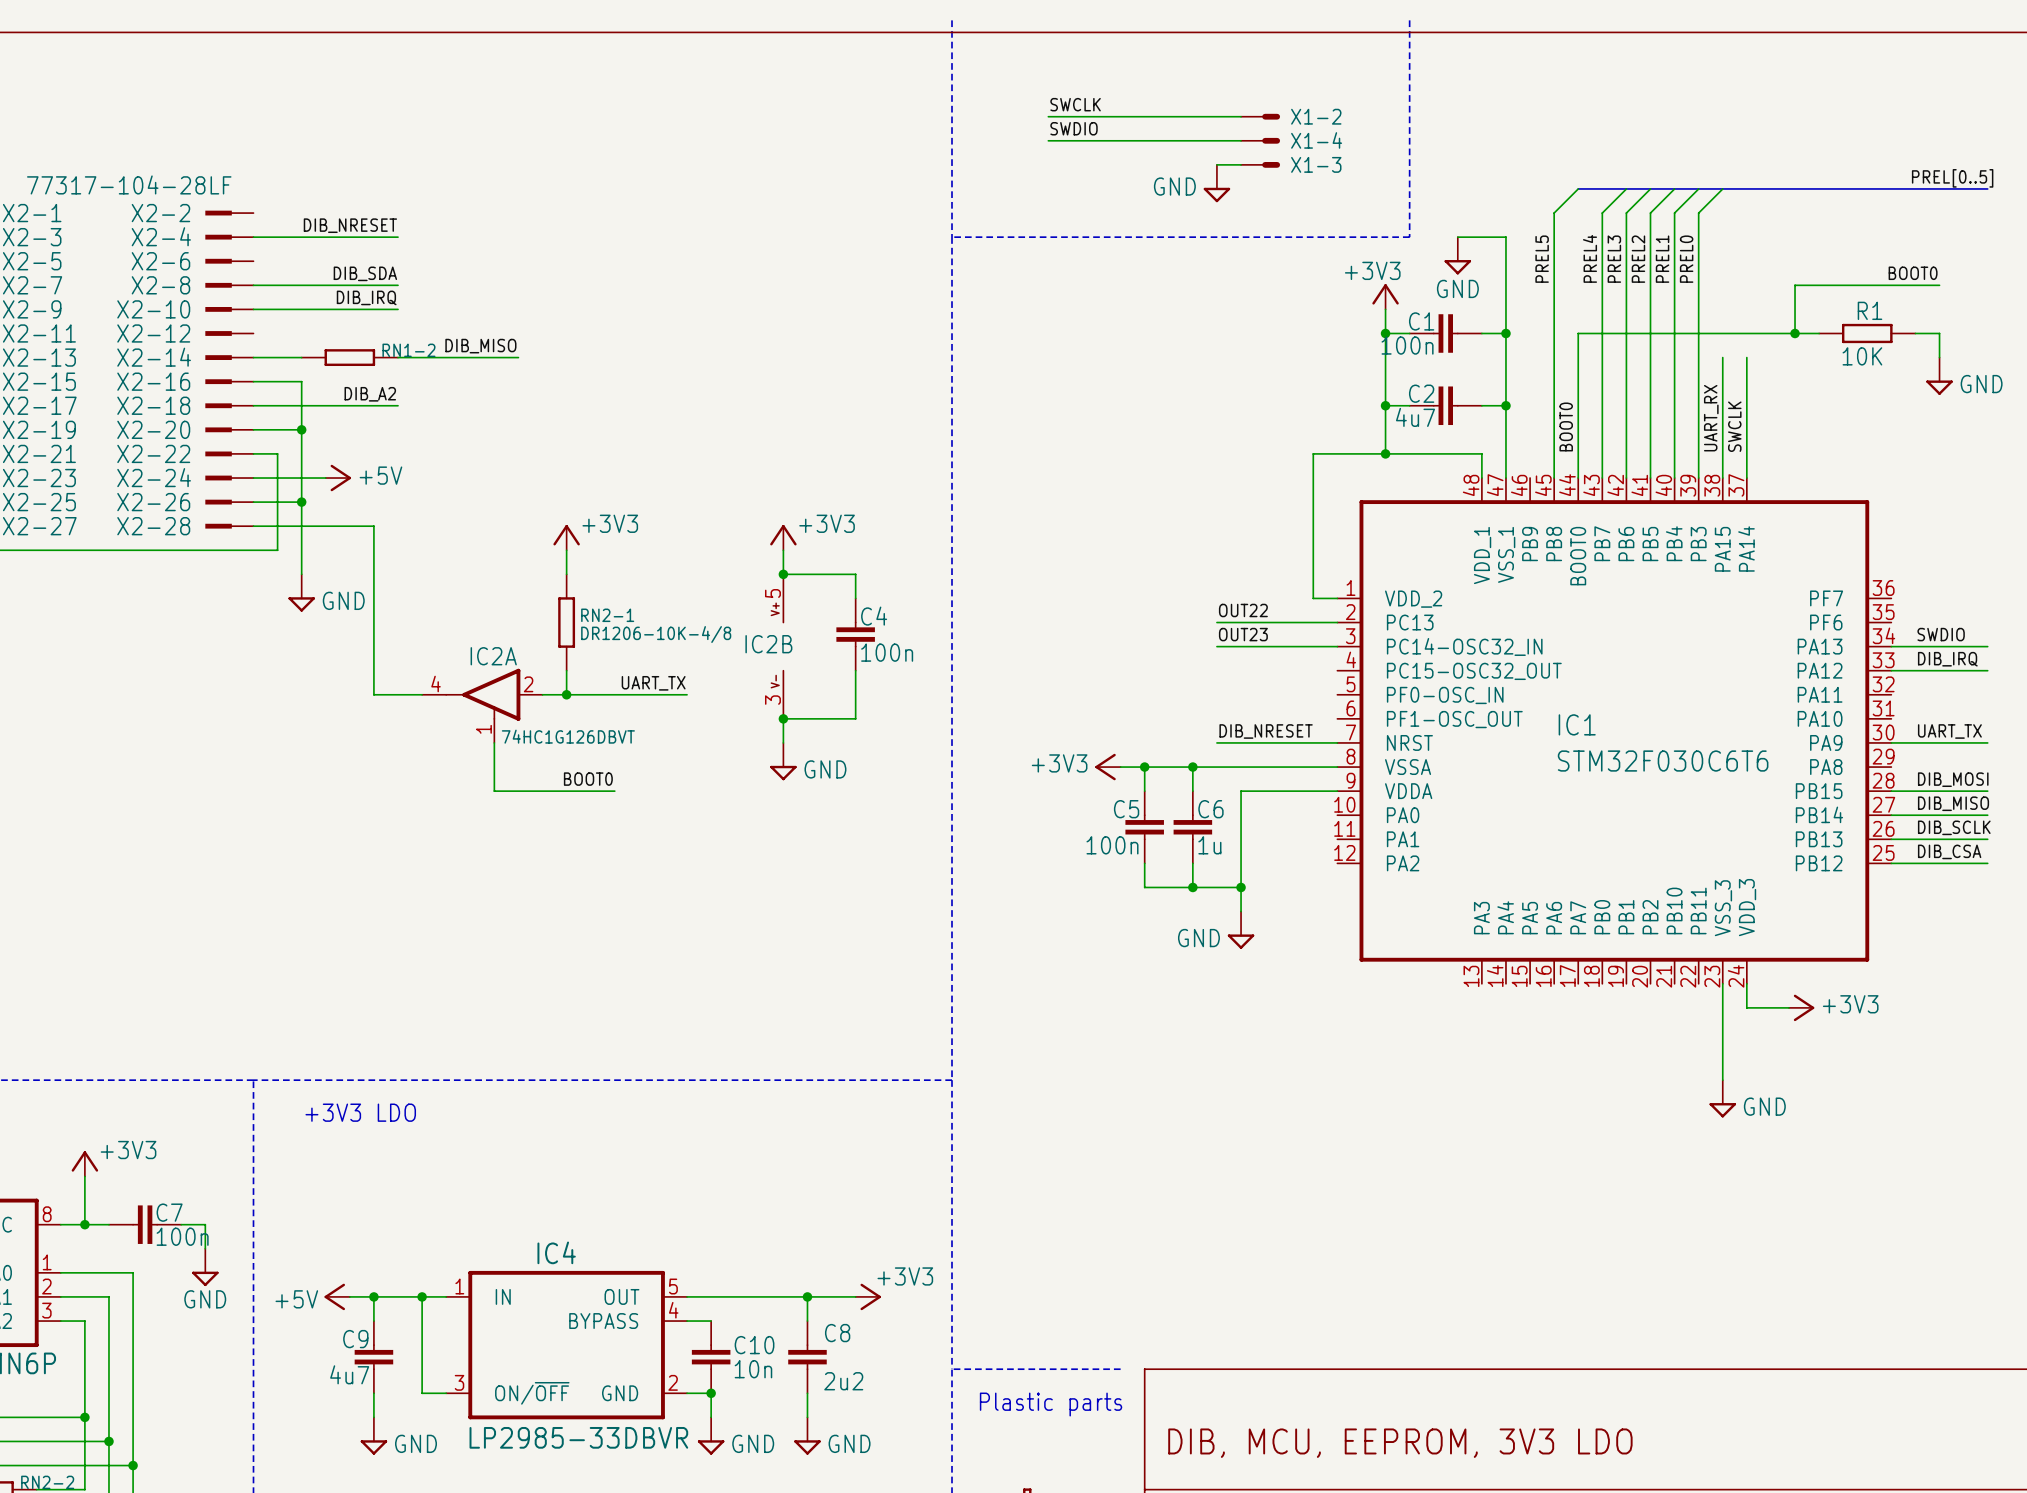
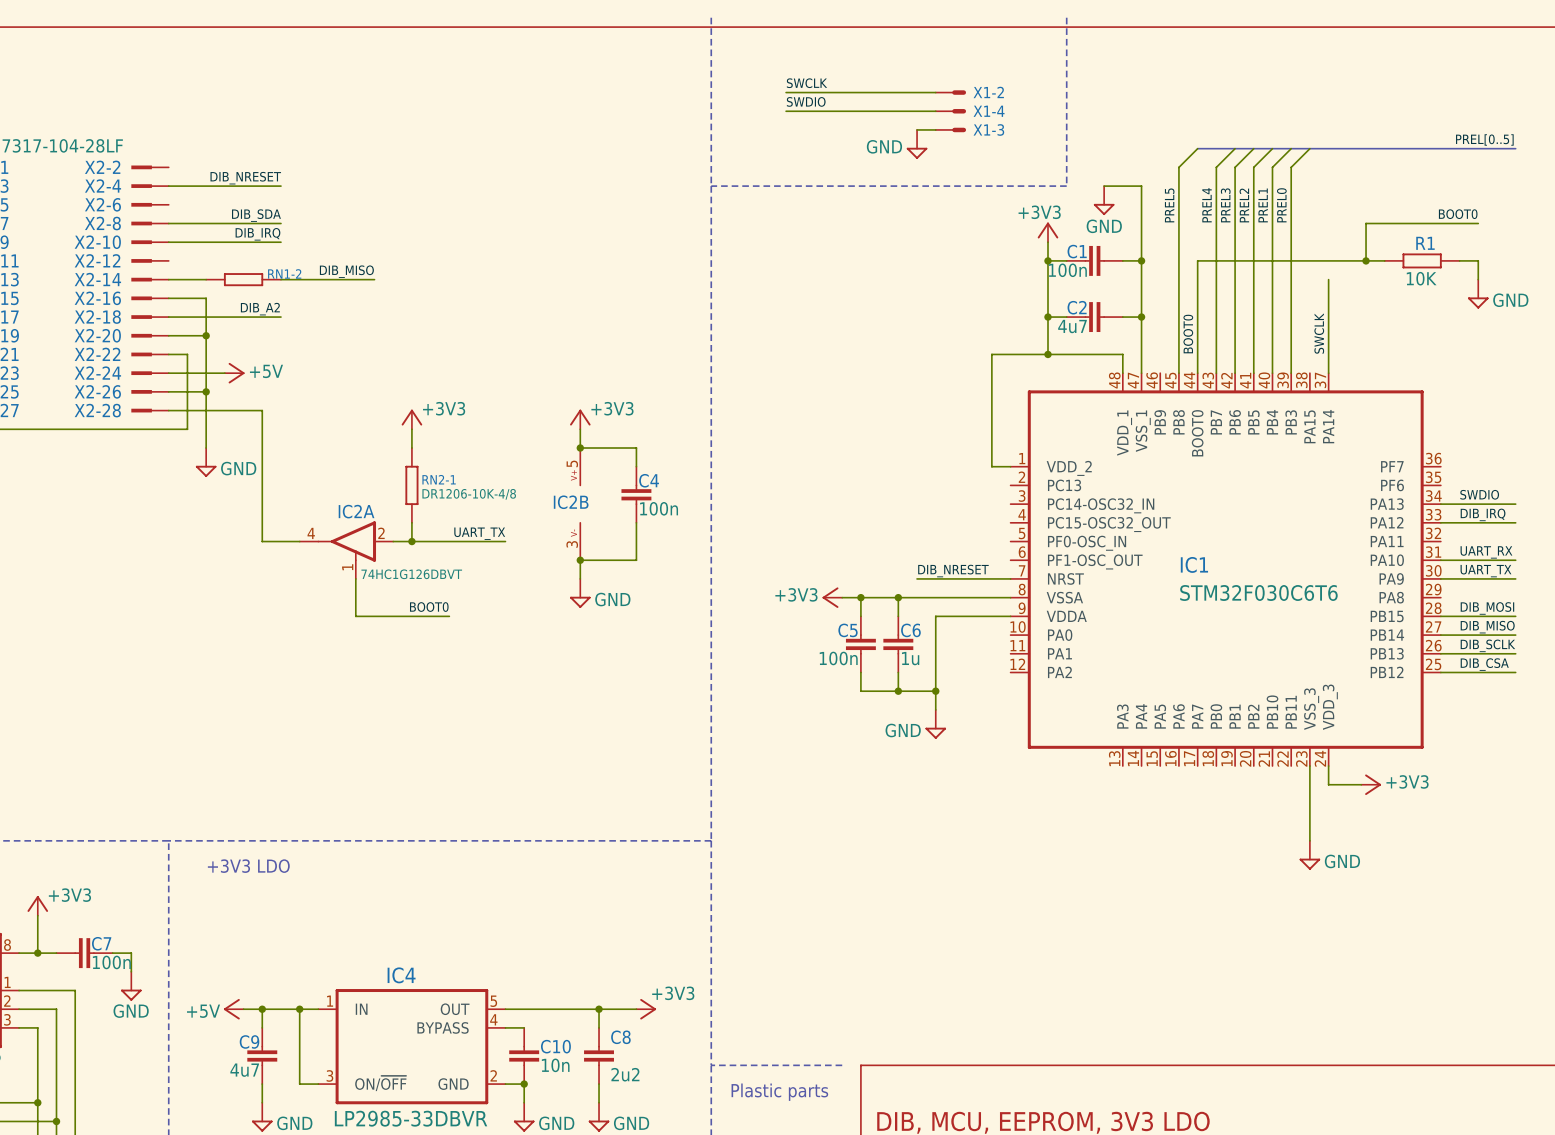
wire: (1722, 357) (1722, 478) -> none
label: UART_RX (1711, 418) -> none
label: OUT22 (1243, 610) -> none
wire: (1216, 622) (1337, 622) -> none
label: OUT23 (1243, 634) -> none
wire: (1216, 646) (1337, 646) -> none
label: none -> UART_RX (1486, 552)
wire: none -> (1440, 560) (1515, 560)

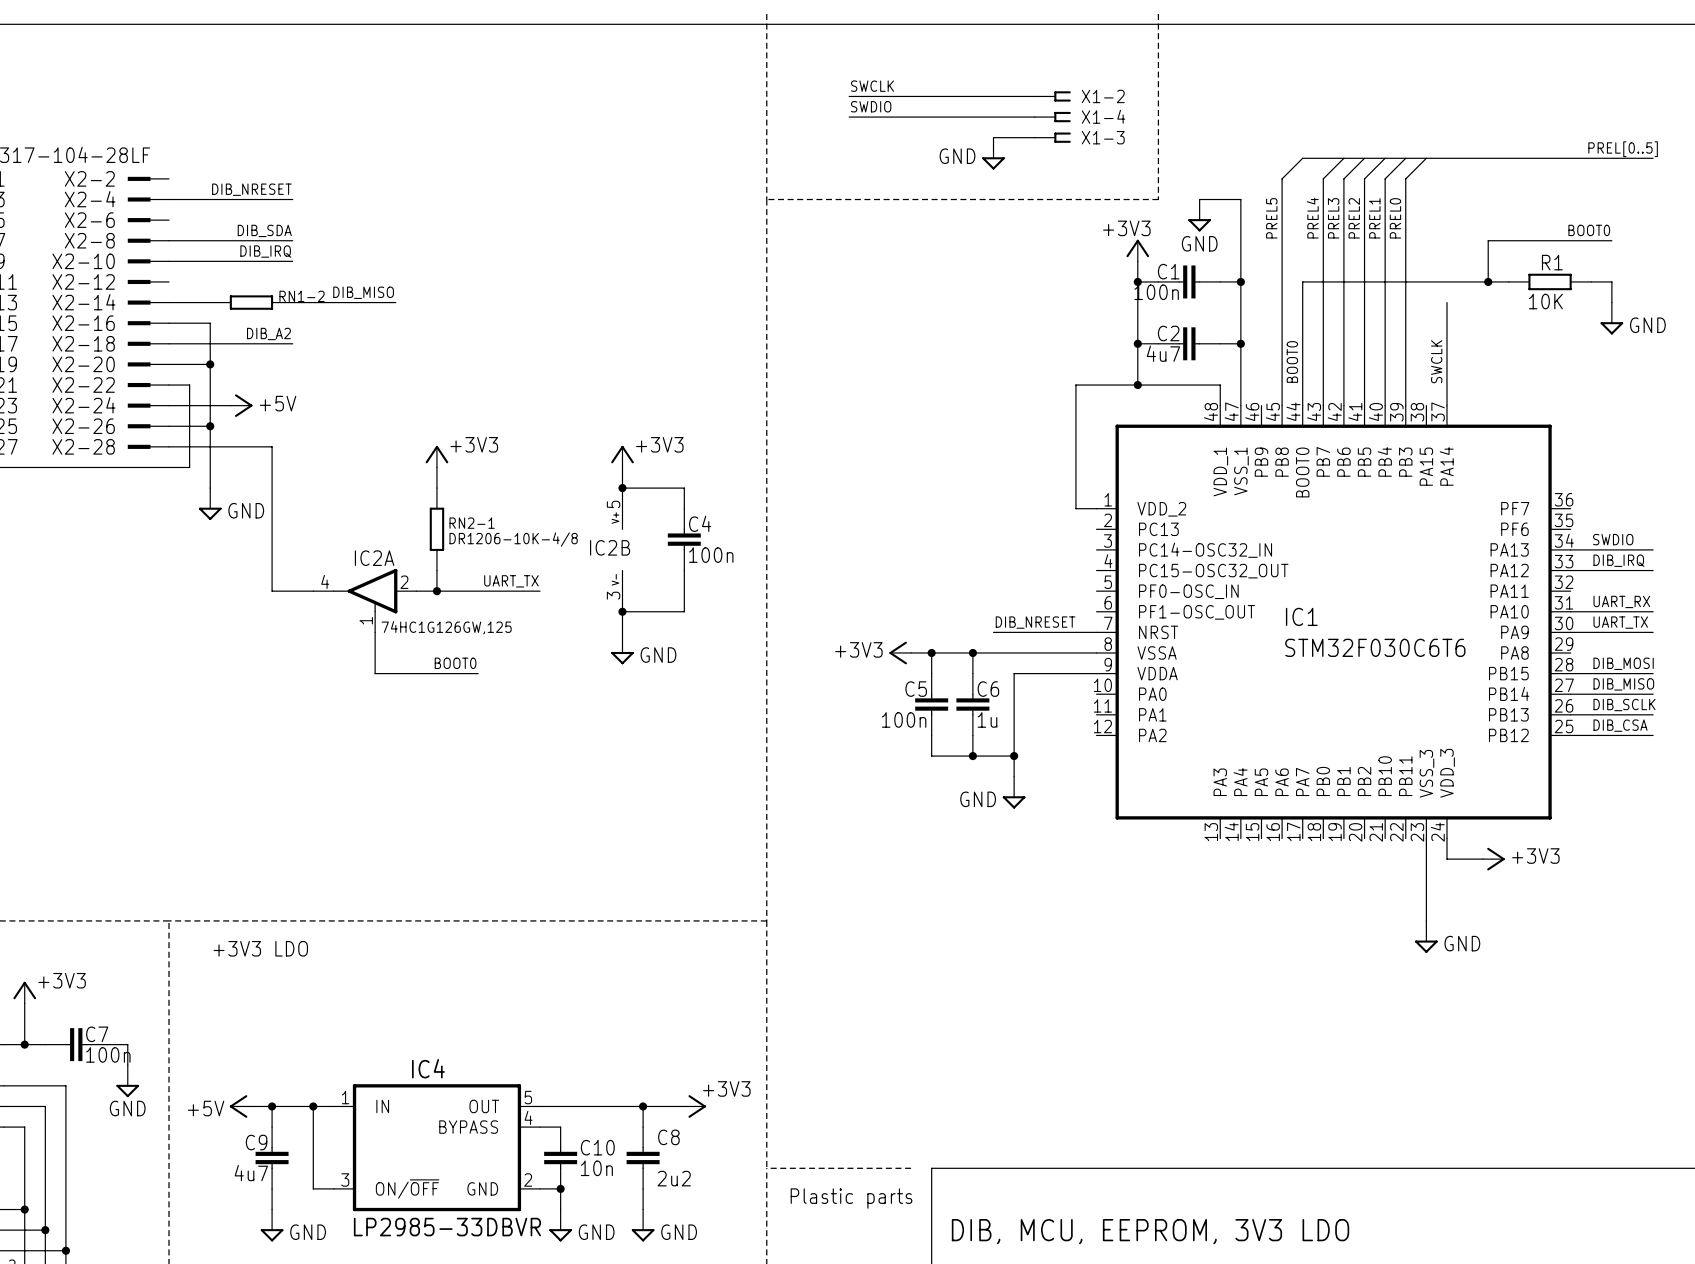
X1-2 symbol: [935, 90, 967, 95] -> [1034, 91, 1071, 102]
X1-4 symbol: [935, 109, 967, 114] -> [1034, 111, 1071, 123]
X1-3 symbol: [935, 127, 967, 133] -> [1034, 132, 1071, 143]
IC2A value: 74HC1G126DBVT (411, 574) -> 74HC1G126GW,125 (446, 627)

